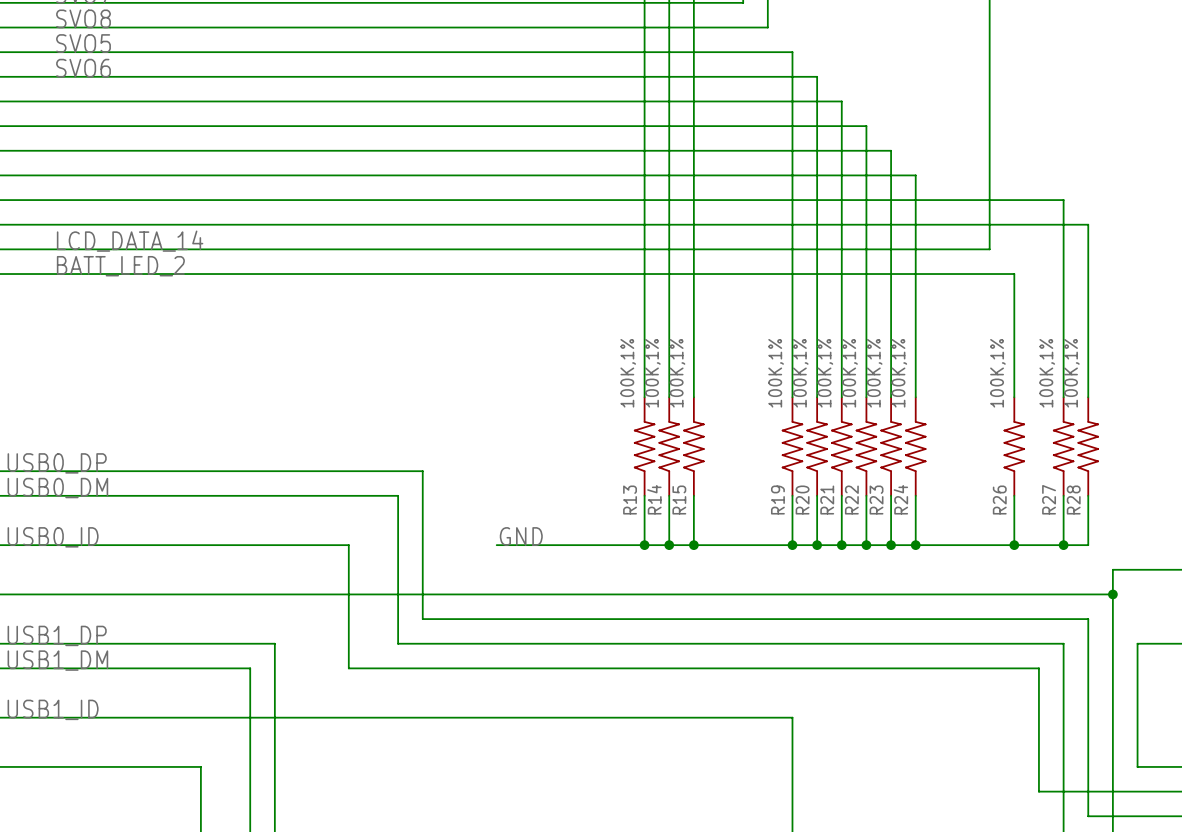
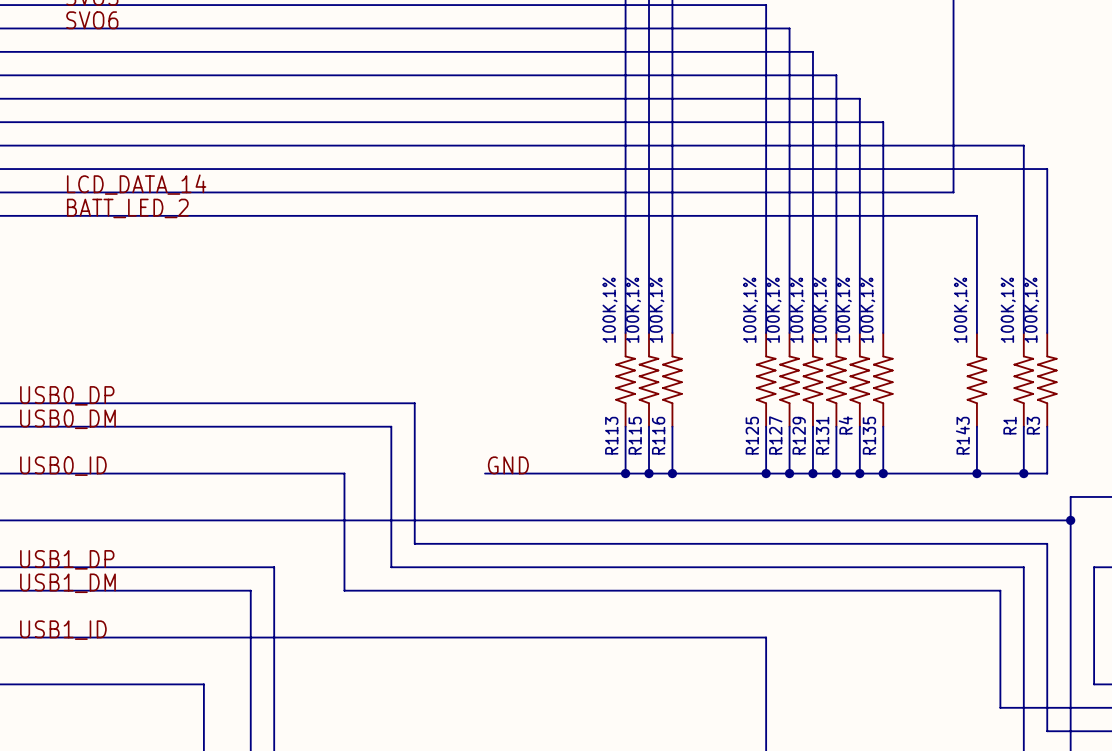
R14 name: R14 (654, 499) -> R115 (635, 435)
R24 name: R24 (900, 499) -> R135 (869, 435)
R27 name: R27 (1049, 499) -> R1 (1009, 425)
R13 name: R13 (630, 500) -> R113 (611, 435)
R15 name: R15 (679, 500) -> R116 (658, 435)
R19 name: R19 (777, 500) -> R125 (752, 435)
R20 name: R20 (802, 500) -> R127 (775, 435)
R21 name: R21 (827, 500) -> R129 (799, 435)
R22 name: R22 (851, 500) -> R131 (822, 435)
R23 name: R23 (876, 500) -> R4 (845, 425)
R26 name: R26 (999, 500) -> R143 (962, 435)
R28 name: R28 (1073, 500) -> R3 (1033, 425)

